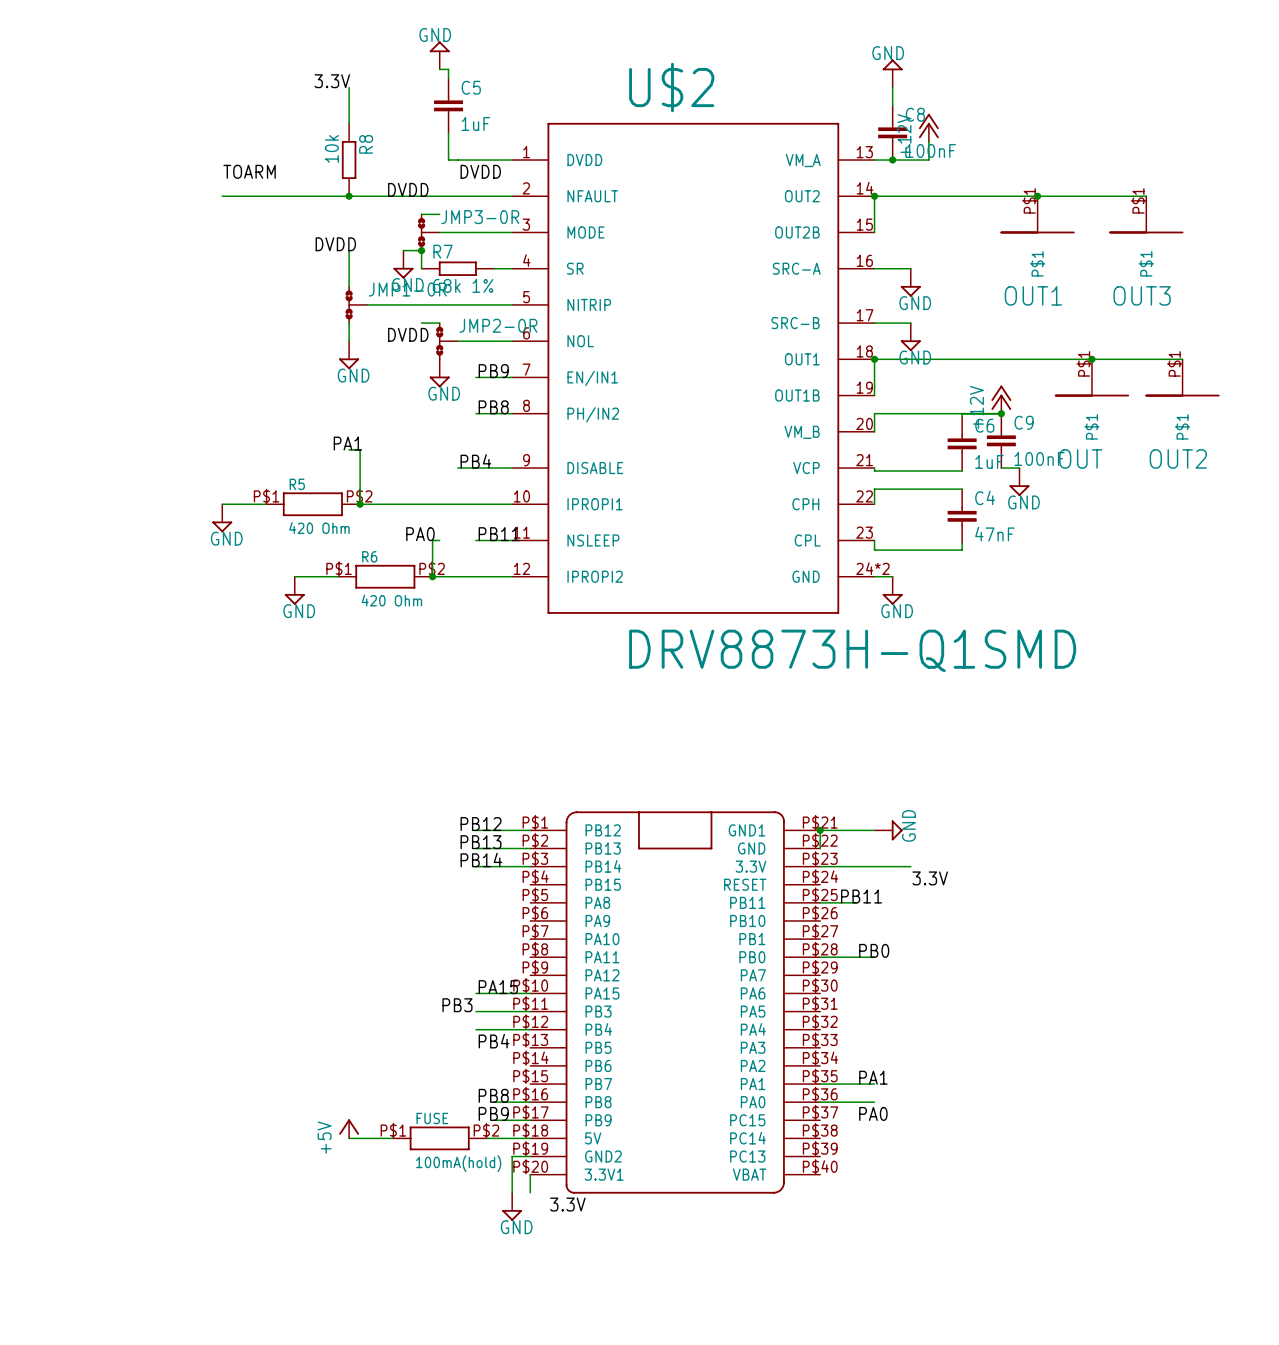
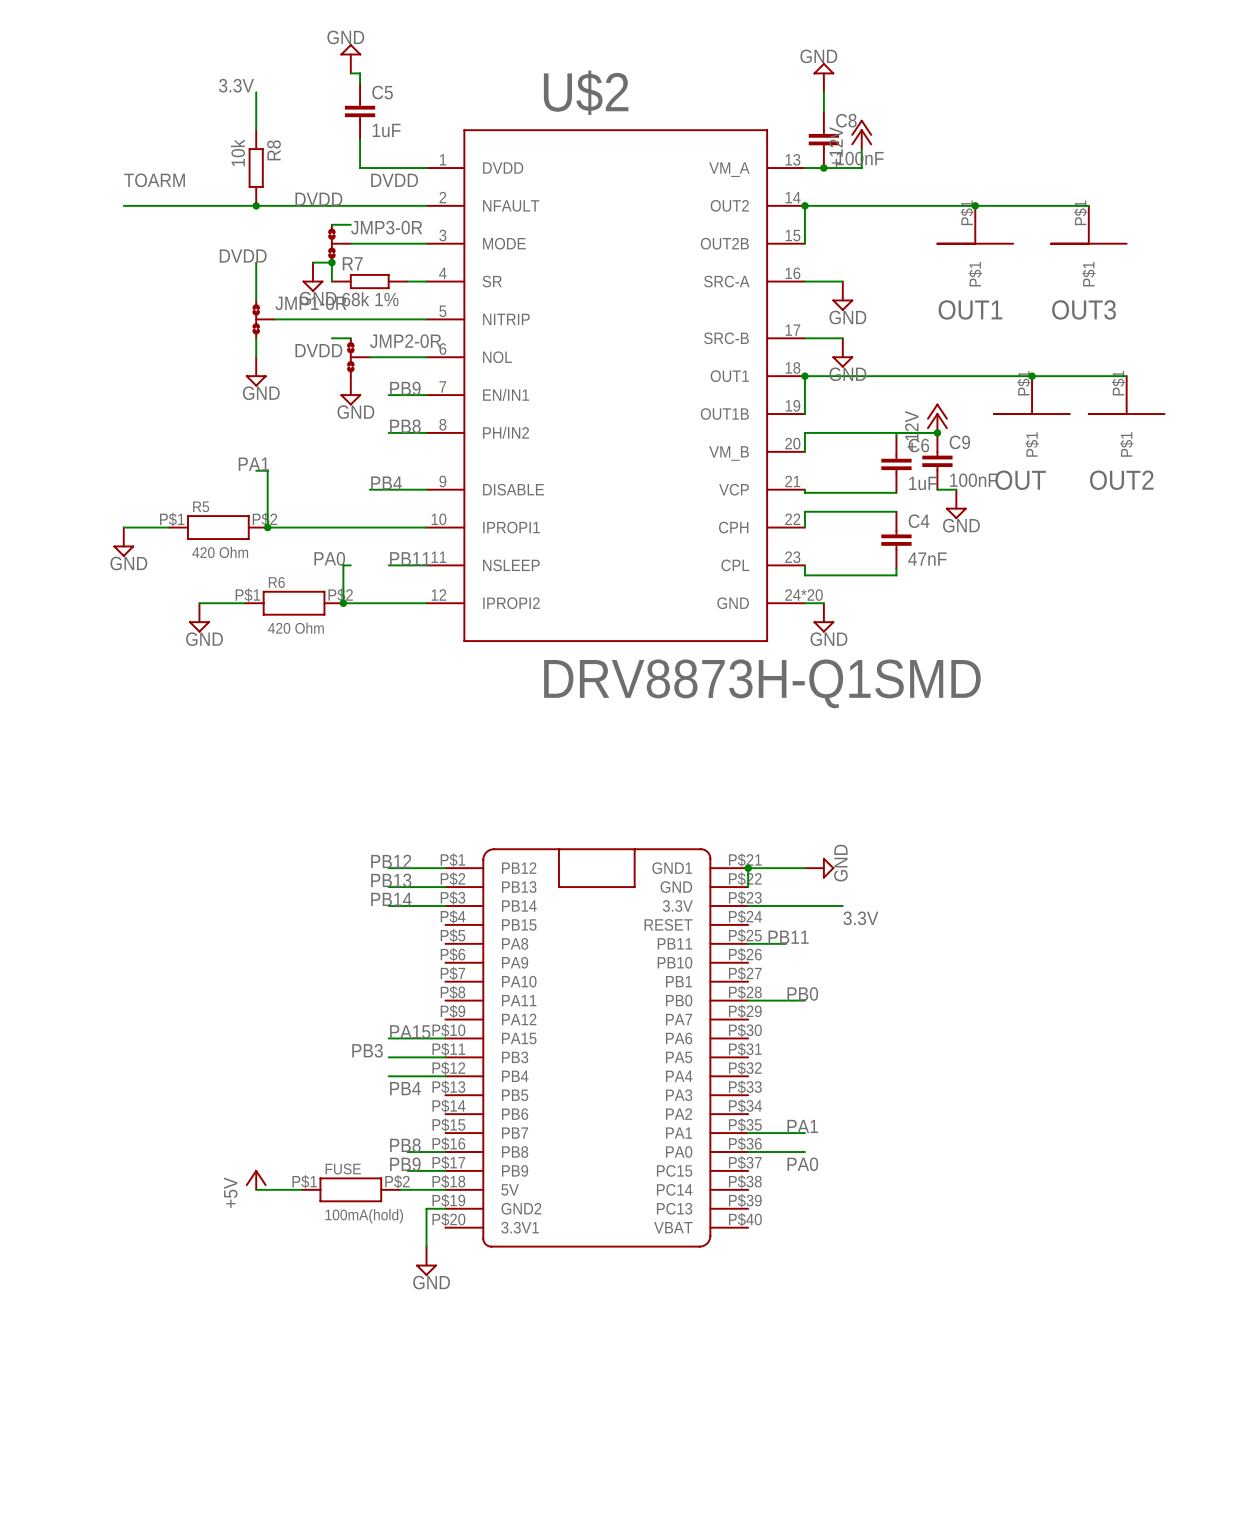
U$2 pin number: 24*2 (872, 568) -> 24*20 (803, 595)
wire: (530, 1174) (530, 1192) -> none
label: 3.3V (567, 1204) -> none

